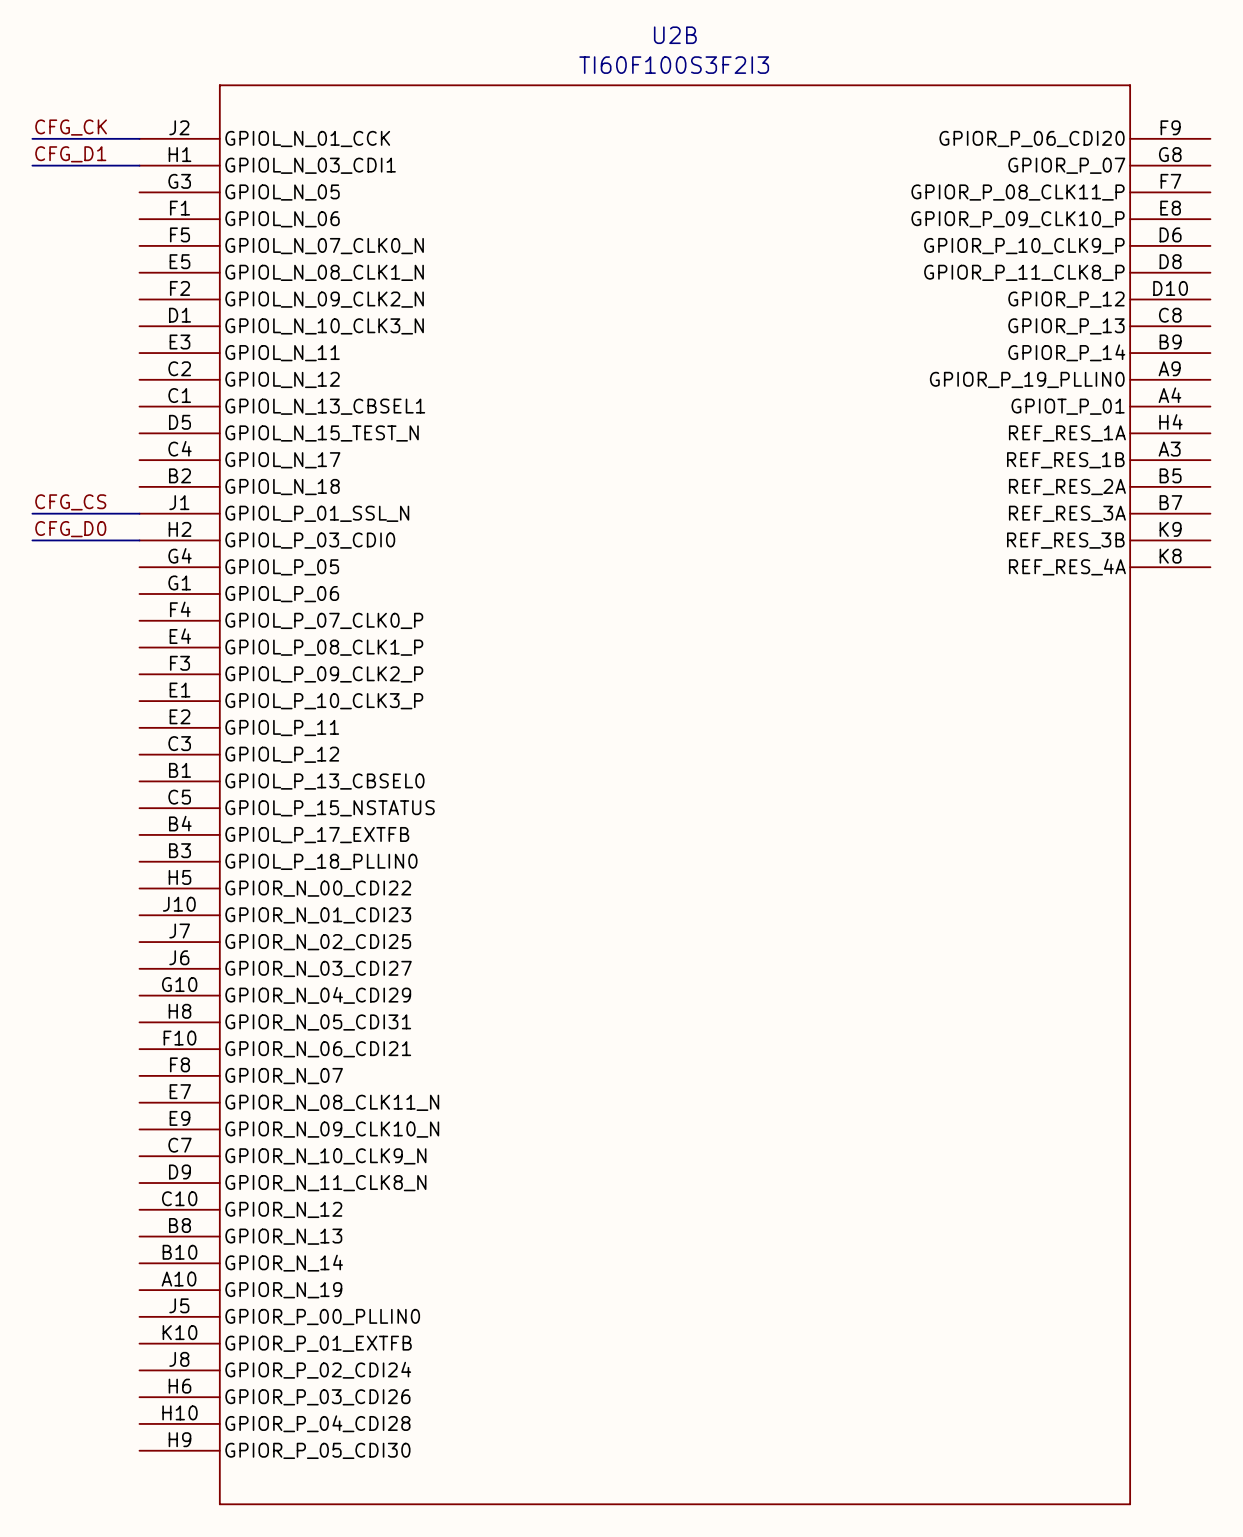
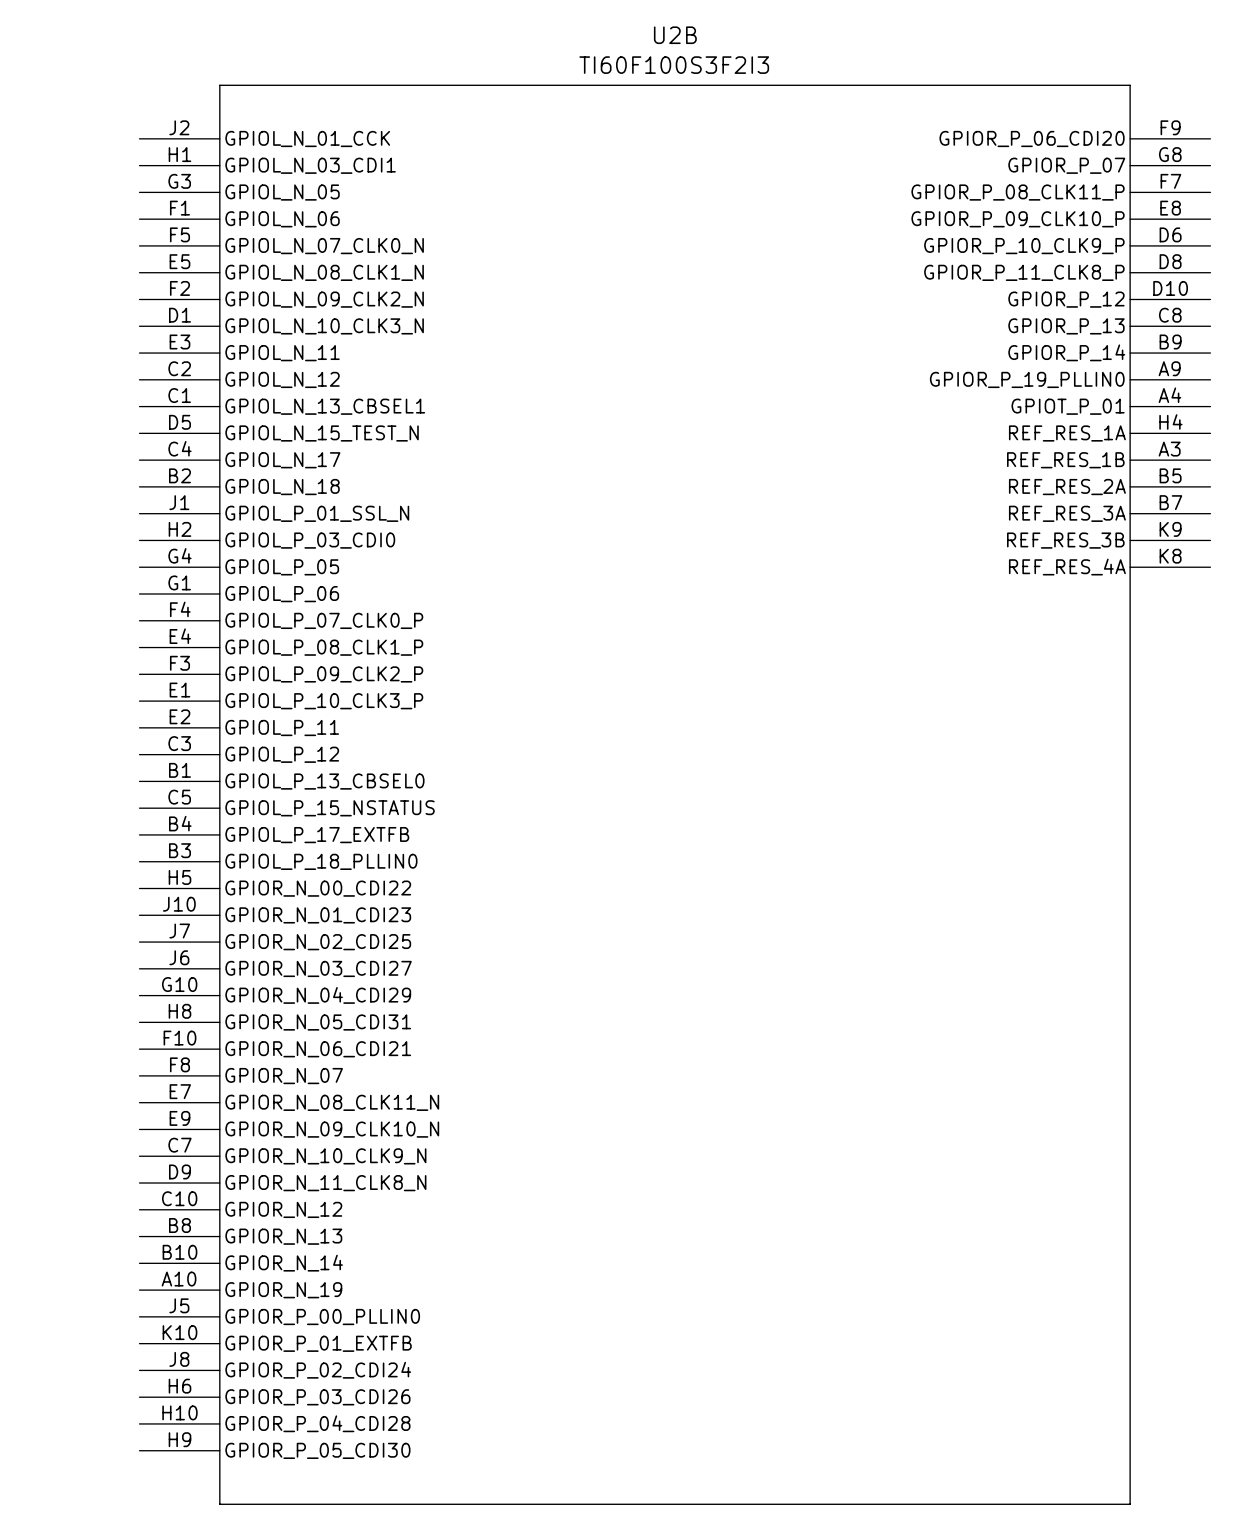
label: CFG_CK (71, 127) -> none
wire: (32, 138) (139, 138) -> none
label: CFG_D1 (70, 154) -> none
wire: (32, 165) (139, 165) -> none
label: CFG_CS (70, 502) -> none
wire: (32, 513) (139, 513) -> none
label: CFG_D0 (70, 529) -> none
wire: (32, 540) (139, 540) -> none

